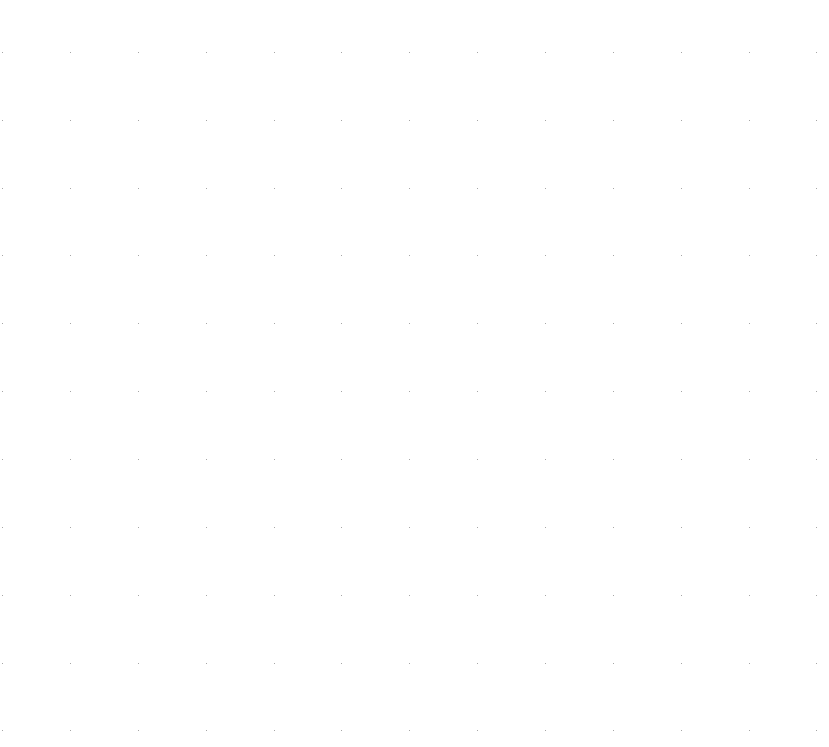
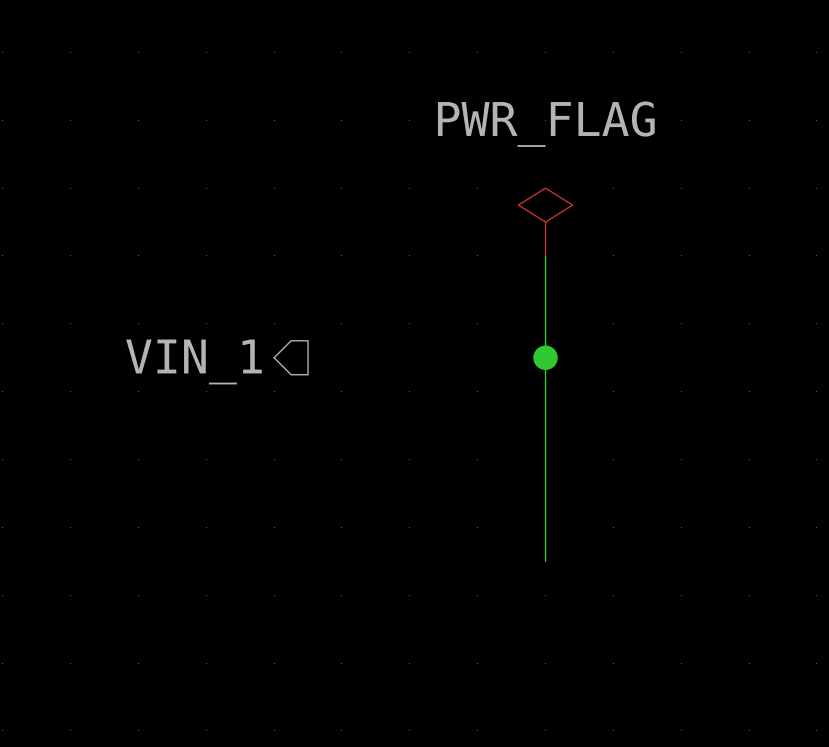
power symbol: none -> PWR_FLAG (545, 222)
wire: none -> (545, 255) (545, 561)
junction: none -> (545, 357)
hierarchical label: none -> VIN_1 (193, 361)

